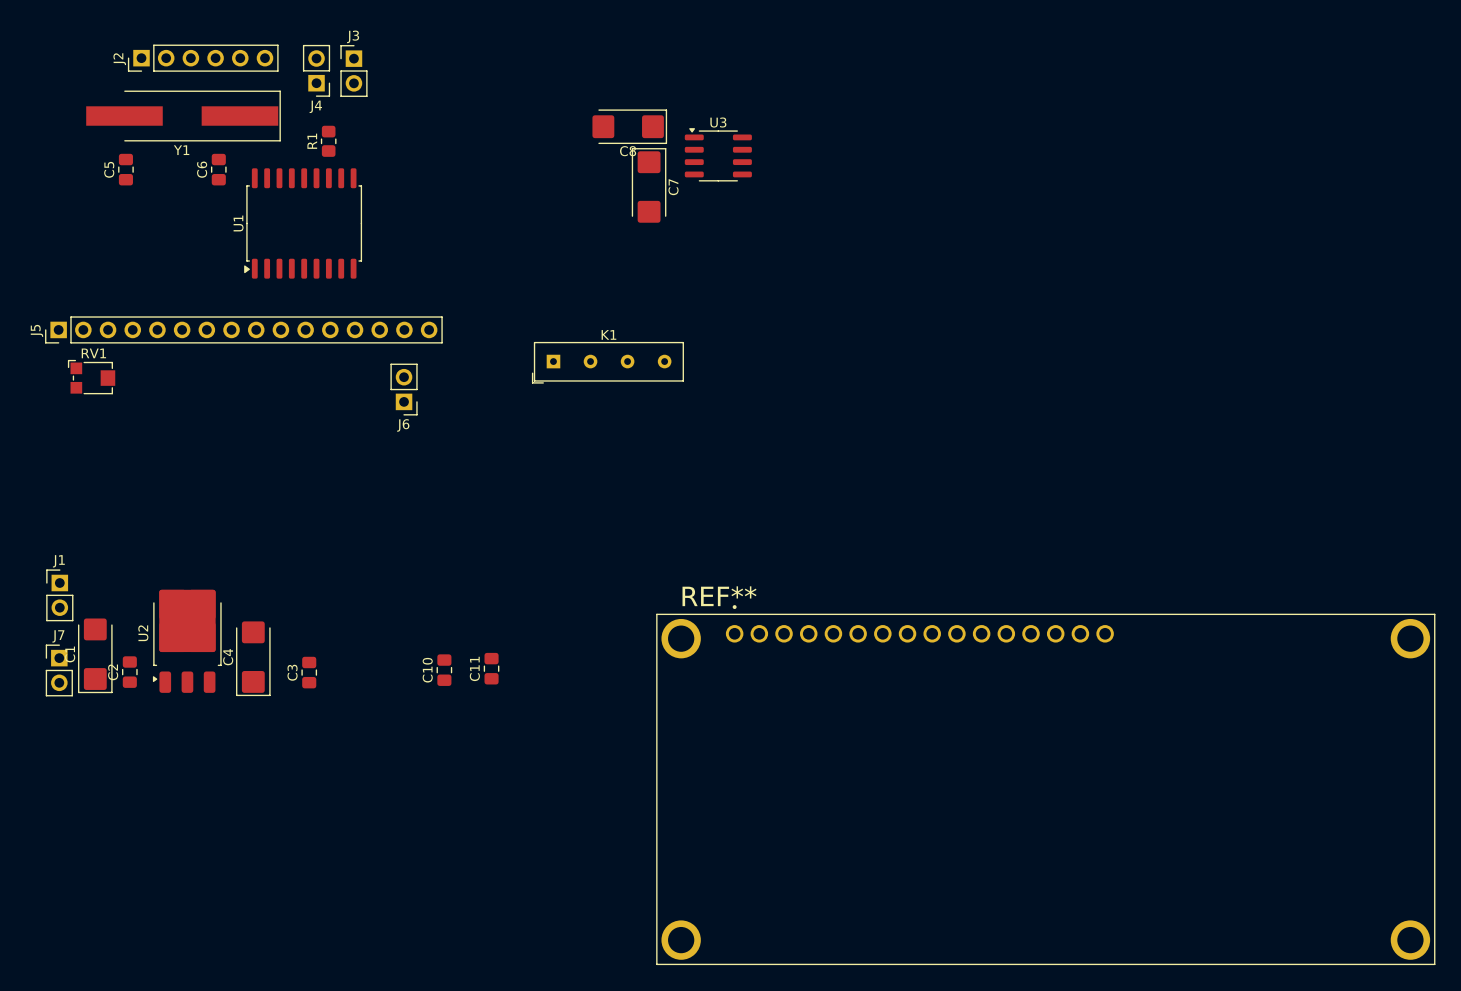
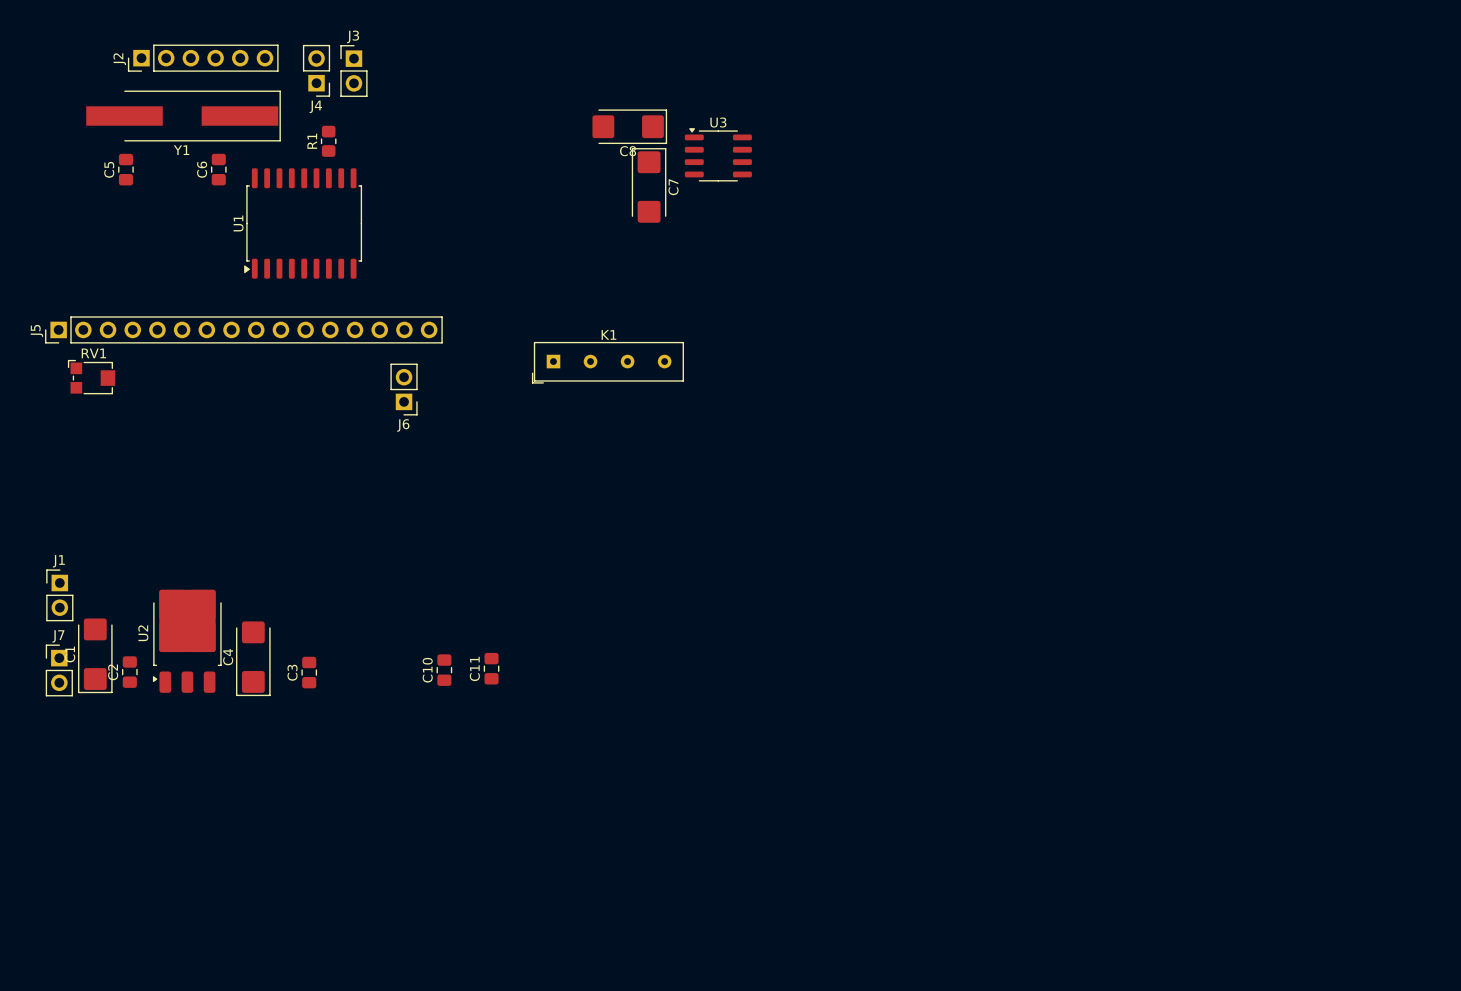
REF**: (1045, 785) -> none

